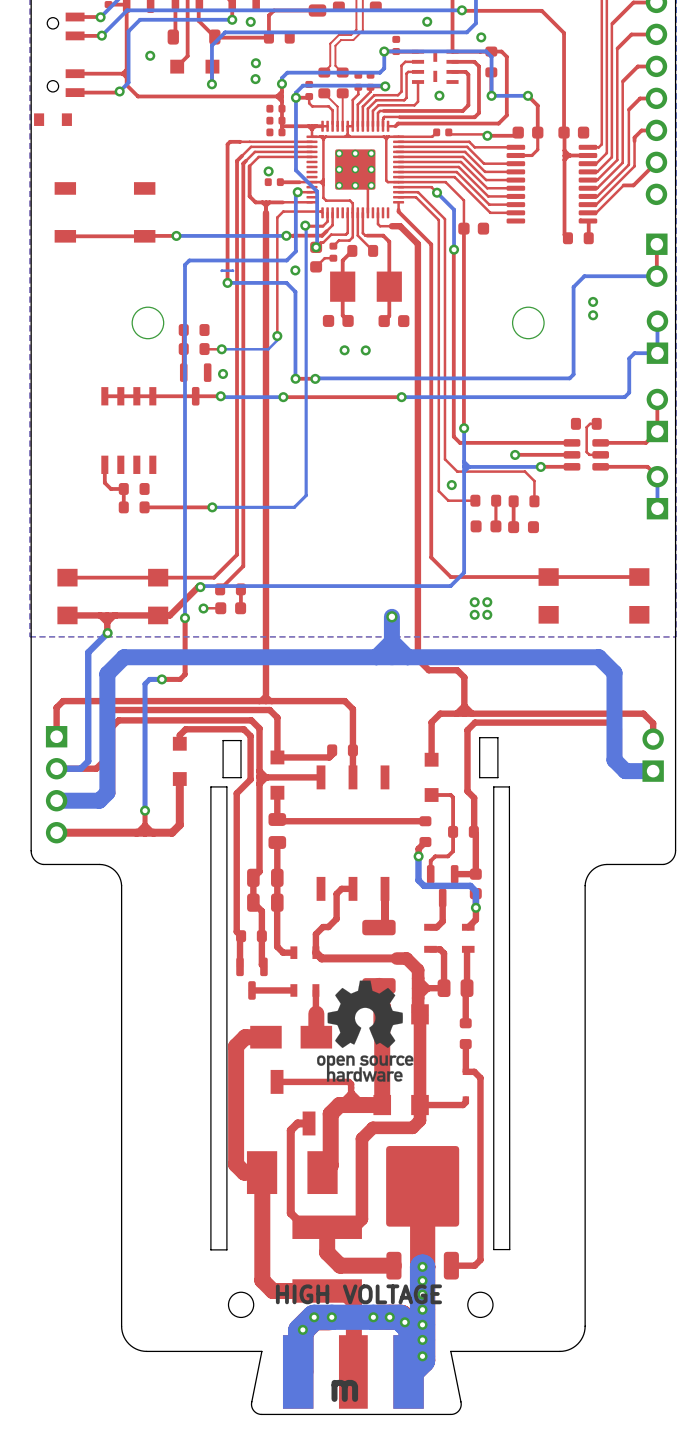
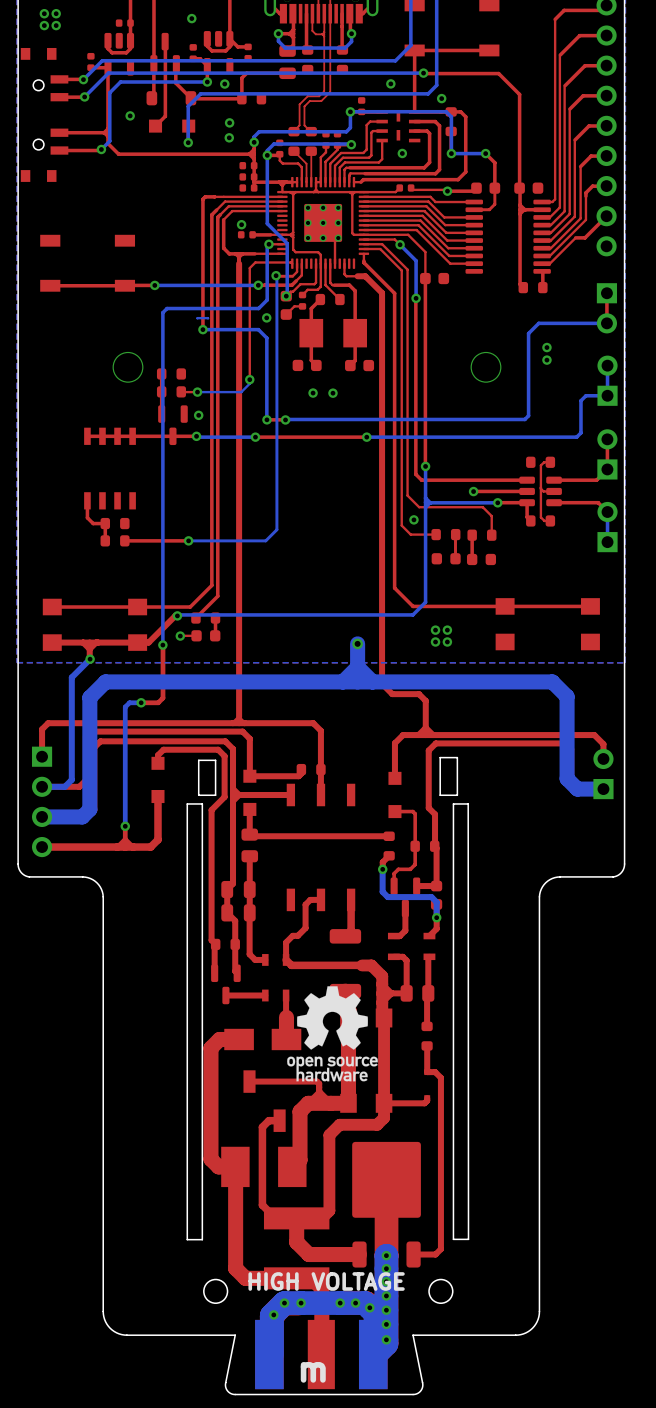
top track: none -> (540, 488) (540, 517) (544, 520) (550, 520)
top track: none -> (527, 502) (527, 517) (530, 520)
part: none -> (540, 520)

